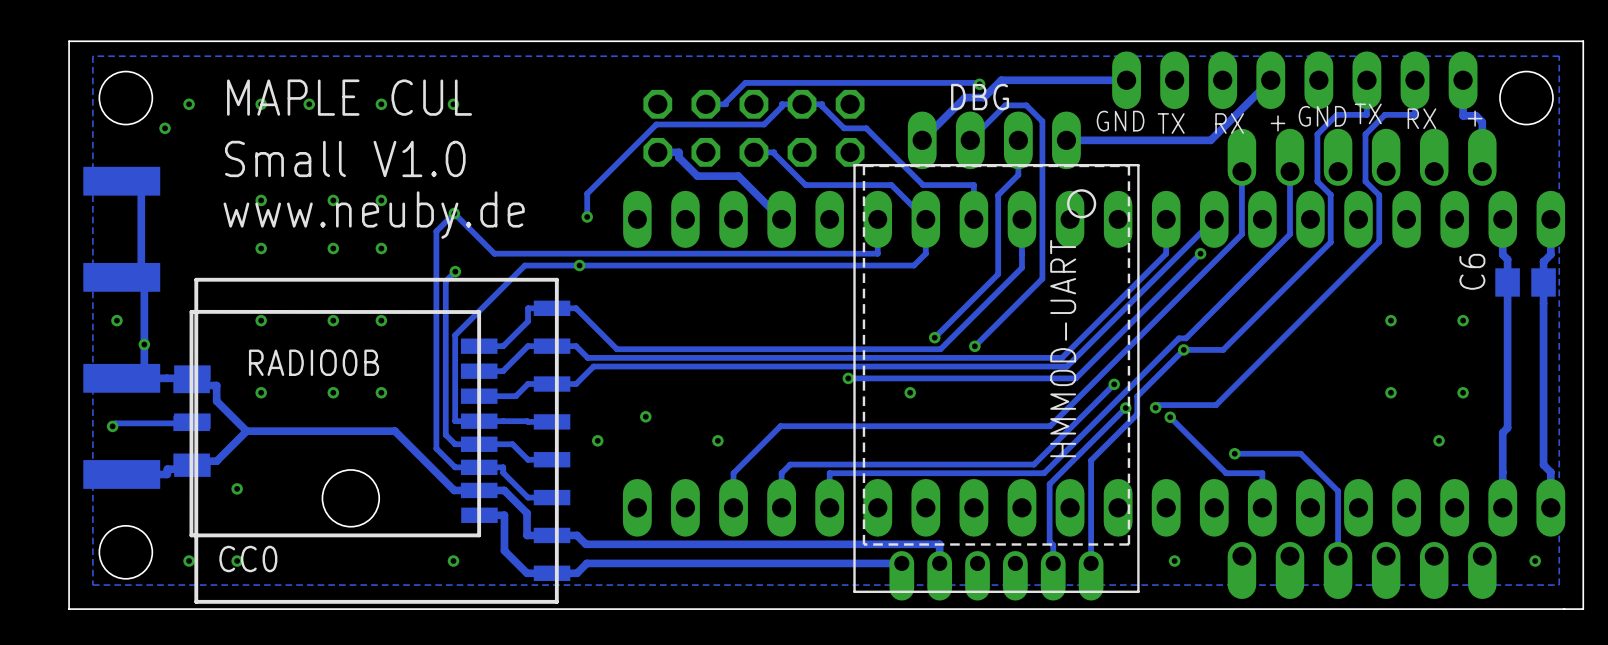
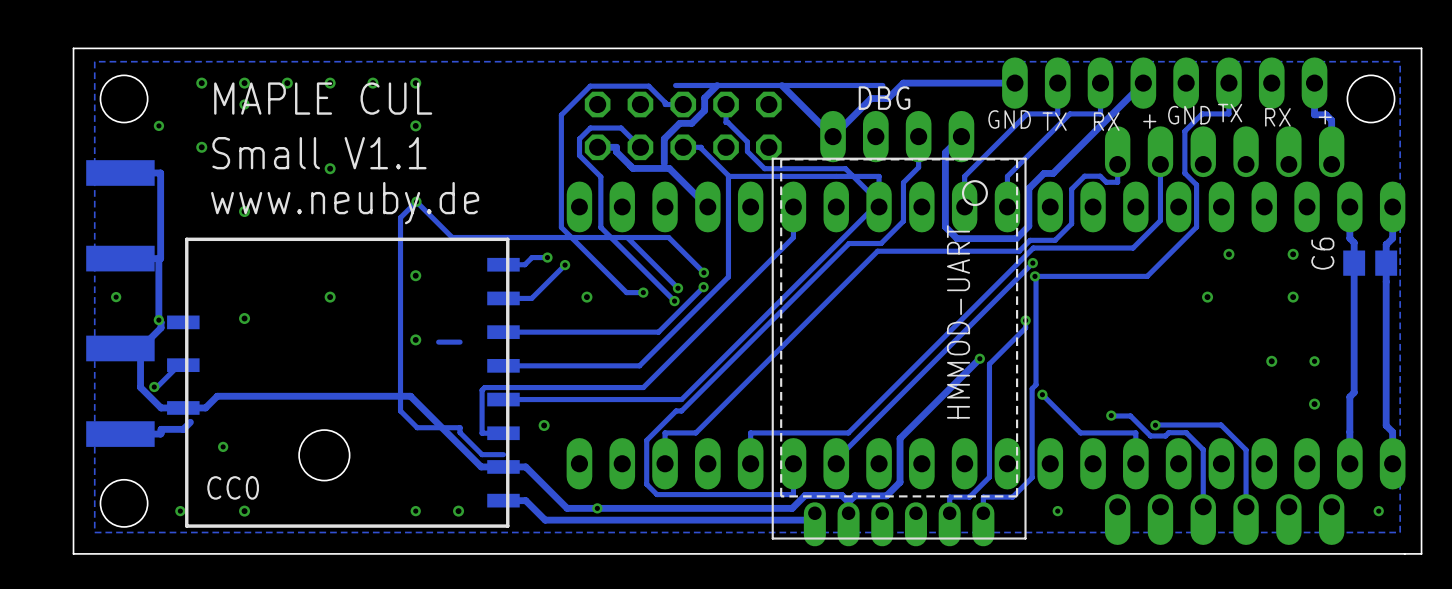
via: none -> (201, 83)
via: none -> (244, 83)
via: none -> (287, 83)
via: none -> (330, 83)
via: none -> (372, 83)
via: none -> (415, 83)
track: none -> (1057, 83) (1057, 113) (1027, 113) (964, 176) (964, 206)
track: none -> (1100, 83) (1100, 113) (1069, 113) (1007, 176) (1007, 206)
track: (1415, 80) (1415, 114) (1384, 114) (1365, 134) (1365, 181) (1379, 195) (1379, 241) (1216, 405) (1158, 405) (1155, 407) -> none
track: (745, 82) (726, 104) (705, 104) -> none
track: none -> (717, 85) (704, 98) (704, 110) (691, 123) (679, 123) (664, 138) (664, 163)
track: none -> (781, 85) (833, 136)
via: (979, 84) -> none
via: (189, 104) -> none
via: (309, 104) -> none
via: (381, 104) -> none
via: (453, 104) -> none
track: none -> (683, 104) (665, 104) (648, 86) (590, 86) (561, 115) (561, 227) (626, 292) (643, 292)
track: none -> (726, 104) (726, 122) (747, 142) (747, 151) (764, 168) (845, 168) (879, 202) (681, 399) (503, 399)
via: none -> (415, 125)
track: (970, 140) (1005, 105) (1026, 105) (1042, 121) (1042, 278) (974, 346) -> none
track: (1210, 140) (1066, 140) -> (1089, 136) (1053, 173) (1044, 173) (1028, 188) (1028, 226) (1016, 238) (957, 238) (945, 226) (945, 152) (961, 136)
via: none -> (201, 147)
track: none -> (640, 147) (621, 128) (590, 128) (579, 138) (579, 155) (600, 176) (600, 227) (674, 301)
text: Small V1.0 (345, 158) -> Small V1.1 (319, 153)
via: none -> (330, 168)
track: (141, 181) (141, 277) -> (137, 172) (160, 172) (160, 258) (140, 258)
track: none -> (729, 176) (728, 276) (639, 365) (503, 365)
track: (891, 185) (925, 219) (925, 253) (913, 265) (524, 265) (455, 335) (455, 421) (552, 421) -> none
track: (923, 185) (866, 128) (844, 128) (822, 104) (781, 104) (781, 106) (764, 124) (656, 124) (587, 193) (587, 216) -> (833, 176) (805, 176)
track: (1241, 191) (1241, 234) (1050, 426) (780, 426) (733, 473) -> (1117, 182) (1106, 182) (1100, 176) (1084, 176) (1071, 189) (1071, 223) (1055, 240) (1030, 240) (1019, 251) (877, 251) (695, 432) (665, 432)
track: (1001, 192) (998, 195) (998, 274) (934, 337) -> (903, 182) (903, 221) (881, 243) (849, 243) (681, 410) (676, 410) (646, 440) (646, 484) (656, 494) (793, 494) (793, 463)
track: (1330, 194) (1330, 242) (1223, 349) (1183, 349) (1137, 396) (1137, 414) (1091, 460) (1091, 545) -> (1036, 276) (1036, 384) (1032, 388) (1032, 477) (1012, 497) (983, 497)
track: none -> (1196, 184) (1196, 227) (1147, 276) (1034, 276)
via: (261, 200) -> none
via: (333, 200) -> none
via: (381, 200) -> none
via: (587, 216) -> none
track: (1021, 219) (1021, 267) (940, 349) (616, 349) (576, 308) (528, 308) (528, 321) (503, 346) (479, 346) -> none
track: (1166, 219) (1166, 253) (1062, 357) (587, 357) (576, 346) (528, 346) (503, 370) -> none
track: (1214, 219) (1067, 366) (593, 366) (576, 384) (528, 384) (515, 396) (479, 396) -> none
via: none -> (244, 211)
track: (1290, 234) (1185, 338) (1178, 338) (1044, 473) (939, 473) -> (1160, 220) (1133, 248) (1033, 248) (848, 432)
via: (261, 248) -> none
via: (333, 248) -> none
via: (381, 248) -> none
track: none -> (627, 237) (678, 288)
track: (877, 253) (737, 253) -> (703, 272) (668, 237)
track: none -> (793, 237) (643, 387) (484, 387) (482, 390) (482, 433) (503, 433)
track: (1200, 253) (1075, 378) (848, 378) -> none
via: (1200, 253) -> none
via: (579, 265) -> none
track: (455, 271) (445, 281) (445, 434) (455, 444) (512, 444) (528, 459) (552, 459) -> none
via: (455, 271) -> none
via: none -> (1228, 254)
via: none -> (1293, 254)
track: none -> (547, 257) (532, 257) (524, 264) (503, 264)
via: none -> (547, 257)
track: (144, 277) (144, 378) (184, 378) (191, 385) (216, 385) (216, 401) (246, 431) -> none
track: none -> (158, 258) (158, 320) (161, 322) (161, 327) (140, 348) (140, 387) (161, 407) (205, 407) (217, 396) (410, 396) (481, 466) (525, 466) (567, 508) (792, 508) (805, 495) (841, 495) (848, 502) (854, 495) (886, 495) (900, 482) (900, 438) (979, 358)
track: none -> (1032, 263) (836, 459) (836, 463)
via: none -> (1032, 263)
track: none -> (565, 265) (531, 298) (503, 298)
via: none -> (565, 265)
via: none -> (703, 272)
via: none -> (415, 275)
via: none -> (1034, 276)
track: none -> (703, 287) (658, 332) (503, 332)
via: none -> (703, 287)
via: none -> (678, 288)
via: none -> (643, 292)
via: (261, 320) -> none
via: (333, 320) -> none
via: none -> (330, 297)
via: (381, 320) -> none
via: none -> (586, 297)
via: none -> (1207, 297)
via: (1390, 320) -> none
via: none -> (1293, 297)
via: (1463, 320) -> none
via: none -> (674, 301)
via: (934, 337) -> none
via position: (144, 344) -> (158, 320)
via: none -> (244, 318)
via: (974, 346) -> none
via: none -> (1025, 320)
via: (1183, 349) -> none
via: none -> (415, 339)
via: (848, 378) -> none
track: (1114, 384) (1034, 464) (790, 464) (781, 473) (781, 507) -> none
via: (1114, 384) -> none
via: none -> (979, 358)
via: (261, 392) -> none
via: (333, 392) -> none
via: (381, 392) -> none
via: (910, 392) -> none
via: (1390, 392) -> none
via: none -> (1271, 361)
track: none -> (183, 365) (179, 365) (155, 388) (154, 386)
via: (1155, 407) -> none
track: (1125, 408) (1049, 484) (1049, 541) (1053, 545) -> (1025, 320) (1025, 327) (989, 364) (989, 477) (969, 497) (949, 497)
via: (1125, 408) -> none
via: (645, 416) -> none
track: (1170, 417) (1226, 473) -> (1042, 394) (1080, 432) (1103, 432)
via: (1170, 417) -> none
via: none -> (154, 386)
track: (192, 421) (191, 423) (115, 423) (112, 426) -> none
RADIO0B: (335, 423) -> none
via: (112, 426) -> none
via: none -> (1042, 394)
track: (246, 431) (216, 461) (191, 461) -> none
track: (246, 431) (394, 431) (454, 490) (504, 490) (527, 513) (527, 535) (577, 535) (585, 544) (939, 544) (939, 550) -> none
CC0 position: (372, 440) -> (343, 382)
via: (597, 440) -> none
via: (717, 440) -> none
via: (1439, 440) -> none
via: none -> (1314, 404)
track: (1234, 453) (1300, 453) (1338, 492) -> (1113, 415) (1130, 415) (1150, 436) (1165, 436) (1168, 432) (1186, 432) (1203, 449)
via: none -> (544, 425)
track: none -> (1155, 425) (1221, 425) (1246, 449) (1246, 506)
via: none -> (1155, 425)
track: (479, 515) (504, 515) (504, 550) (527, 573) (577, 573) (586, 563) (901, 563) -> (503, 500) (525, 500) (545, 520) (808, 520) (814, 513)
via: none -> (597, 508)
via: (237, 561) -> none
via: none -> (244, 511)
via: none -> (458, 511)

